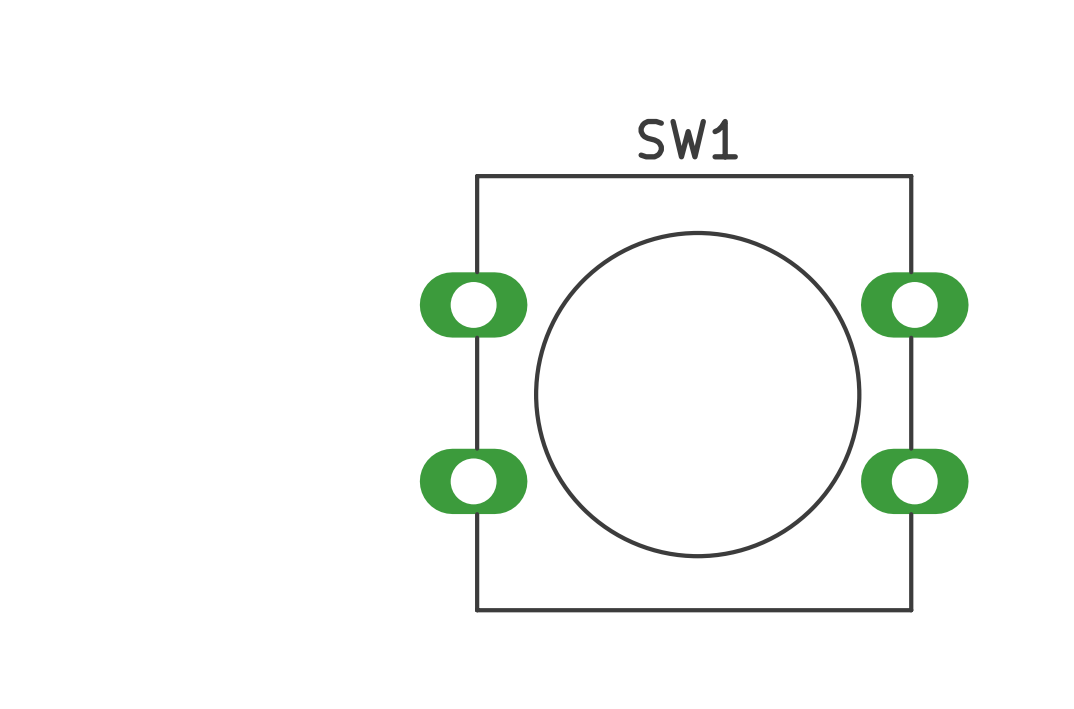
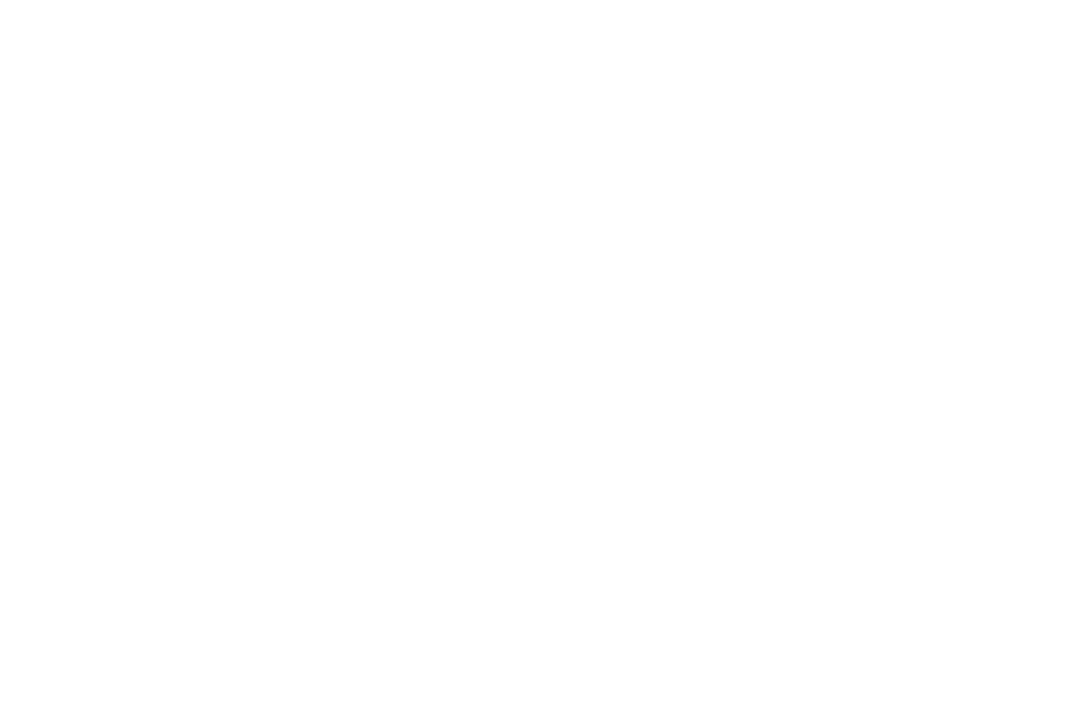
SW1: (694, 393) -> none

